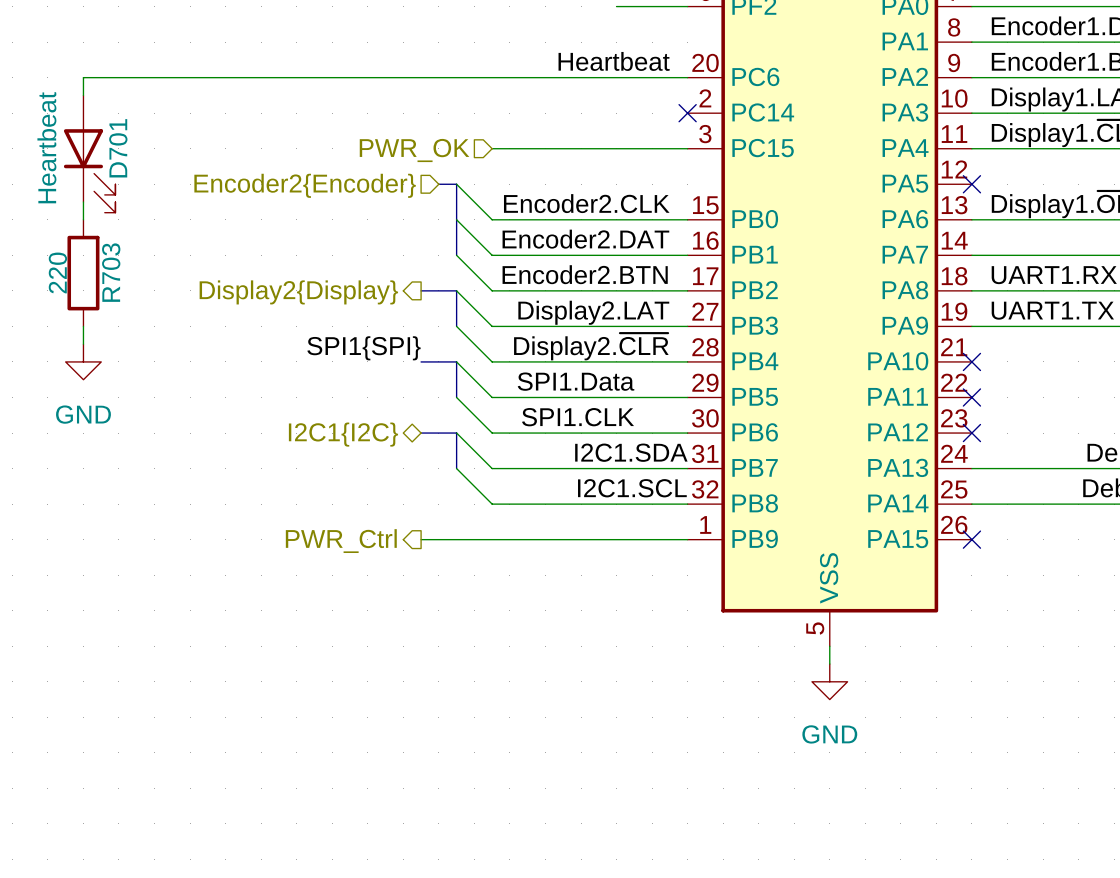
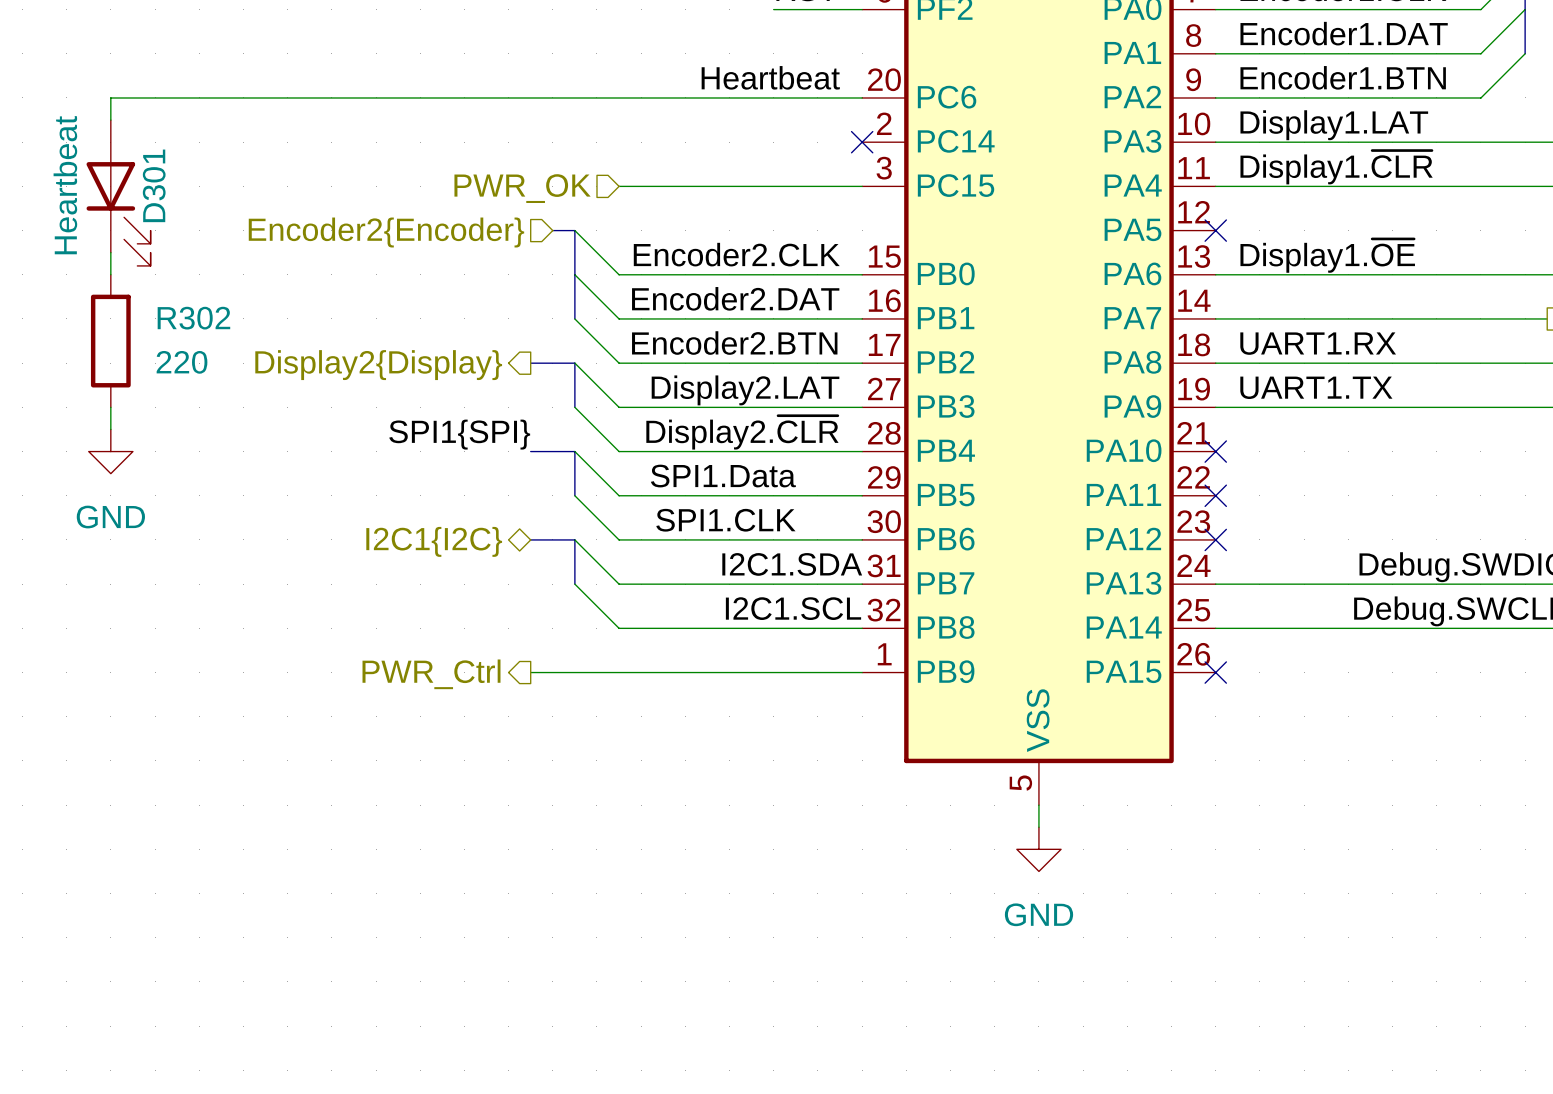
D701 name: D701 (118, 148) -> D301 (154, 185)
R703 value rotation: 0° (57, 272) -> 90° clockwise (182, 362)
R703 value position: 220 (57, 272) -> 220 (182, 362)
R703 name: R703 (111, 272) -> R302 (193, 318)

